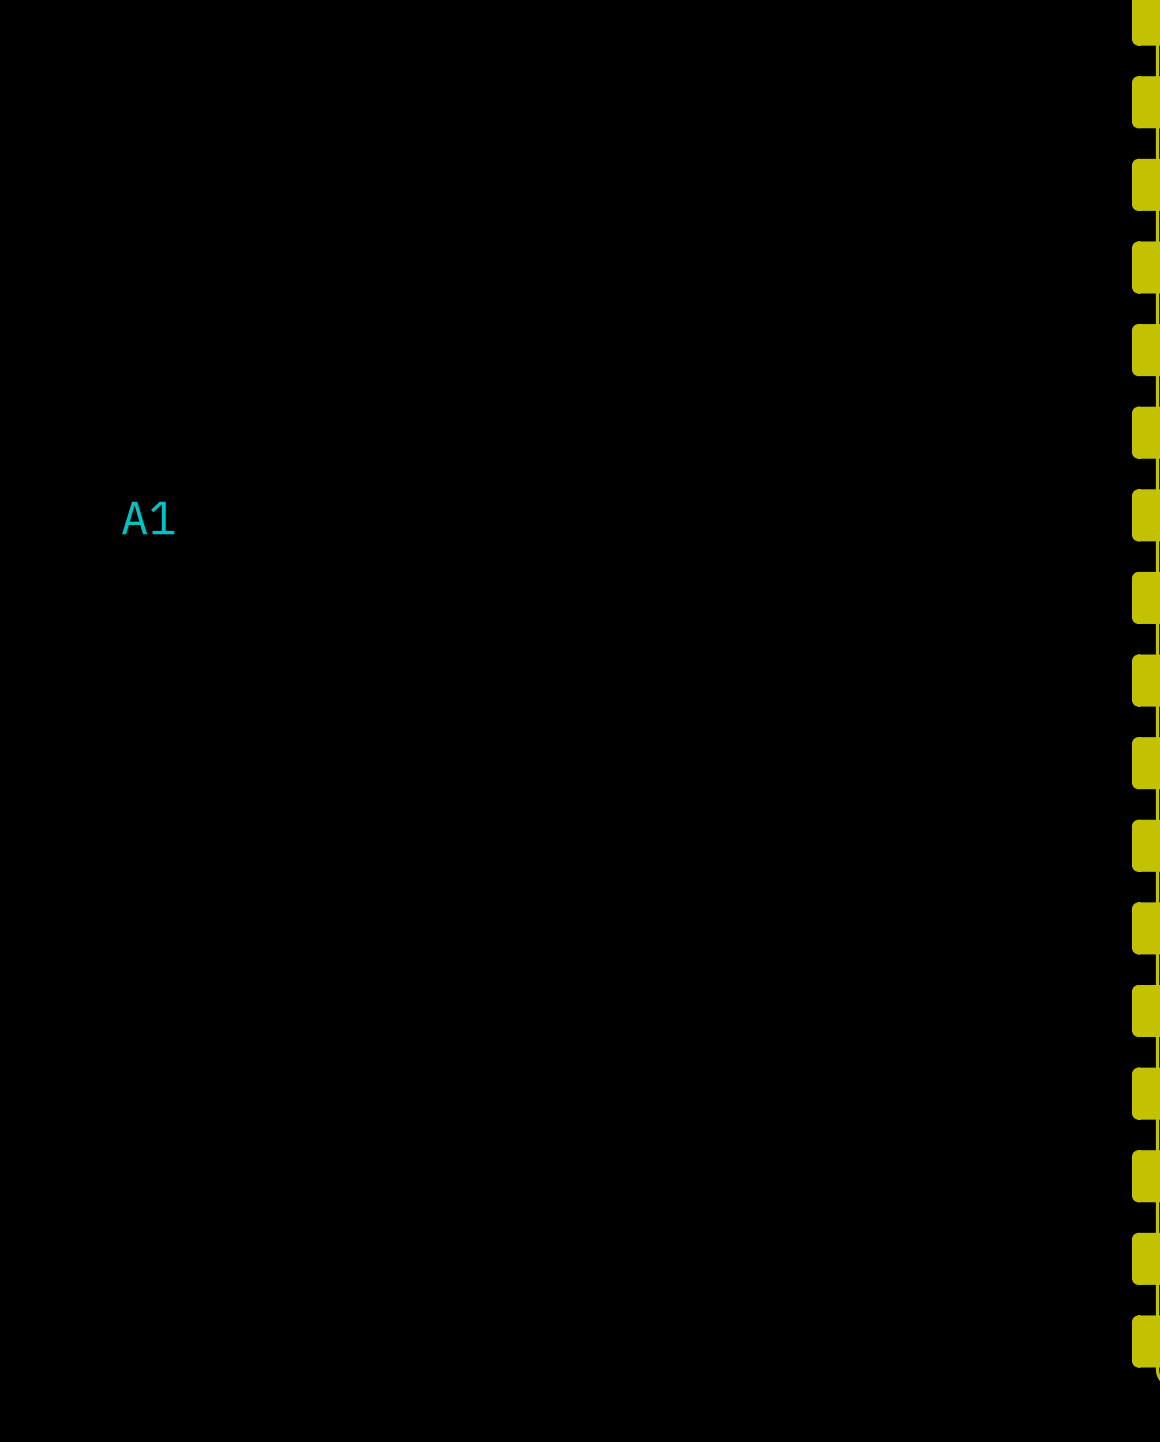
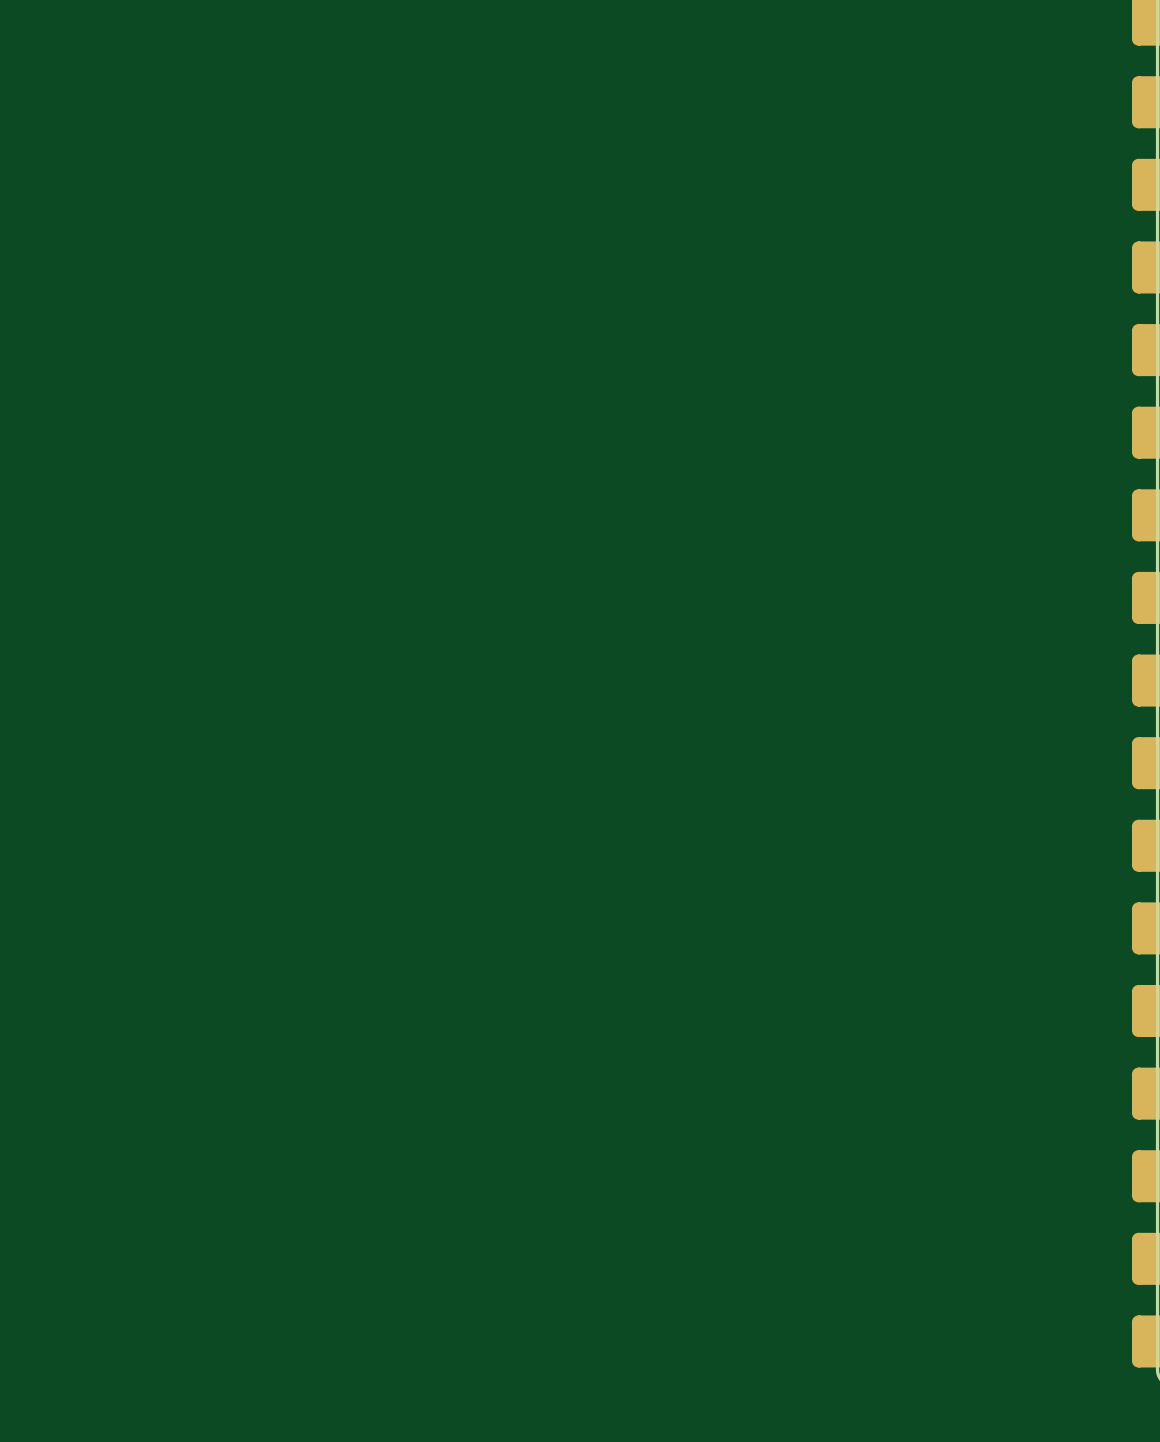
A1 name: A1 (148, 518) -> none

